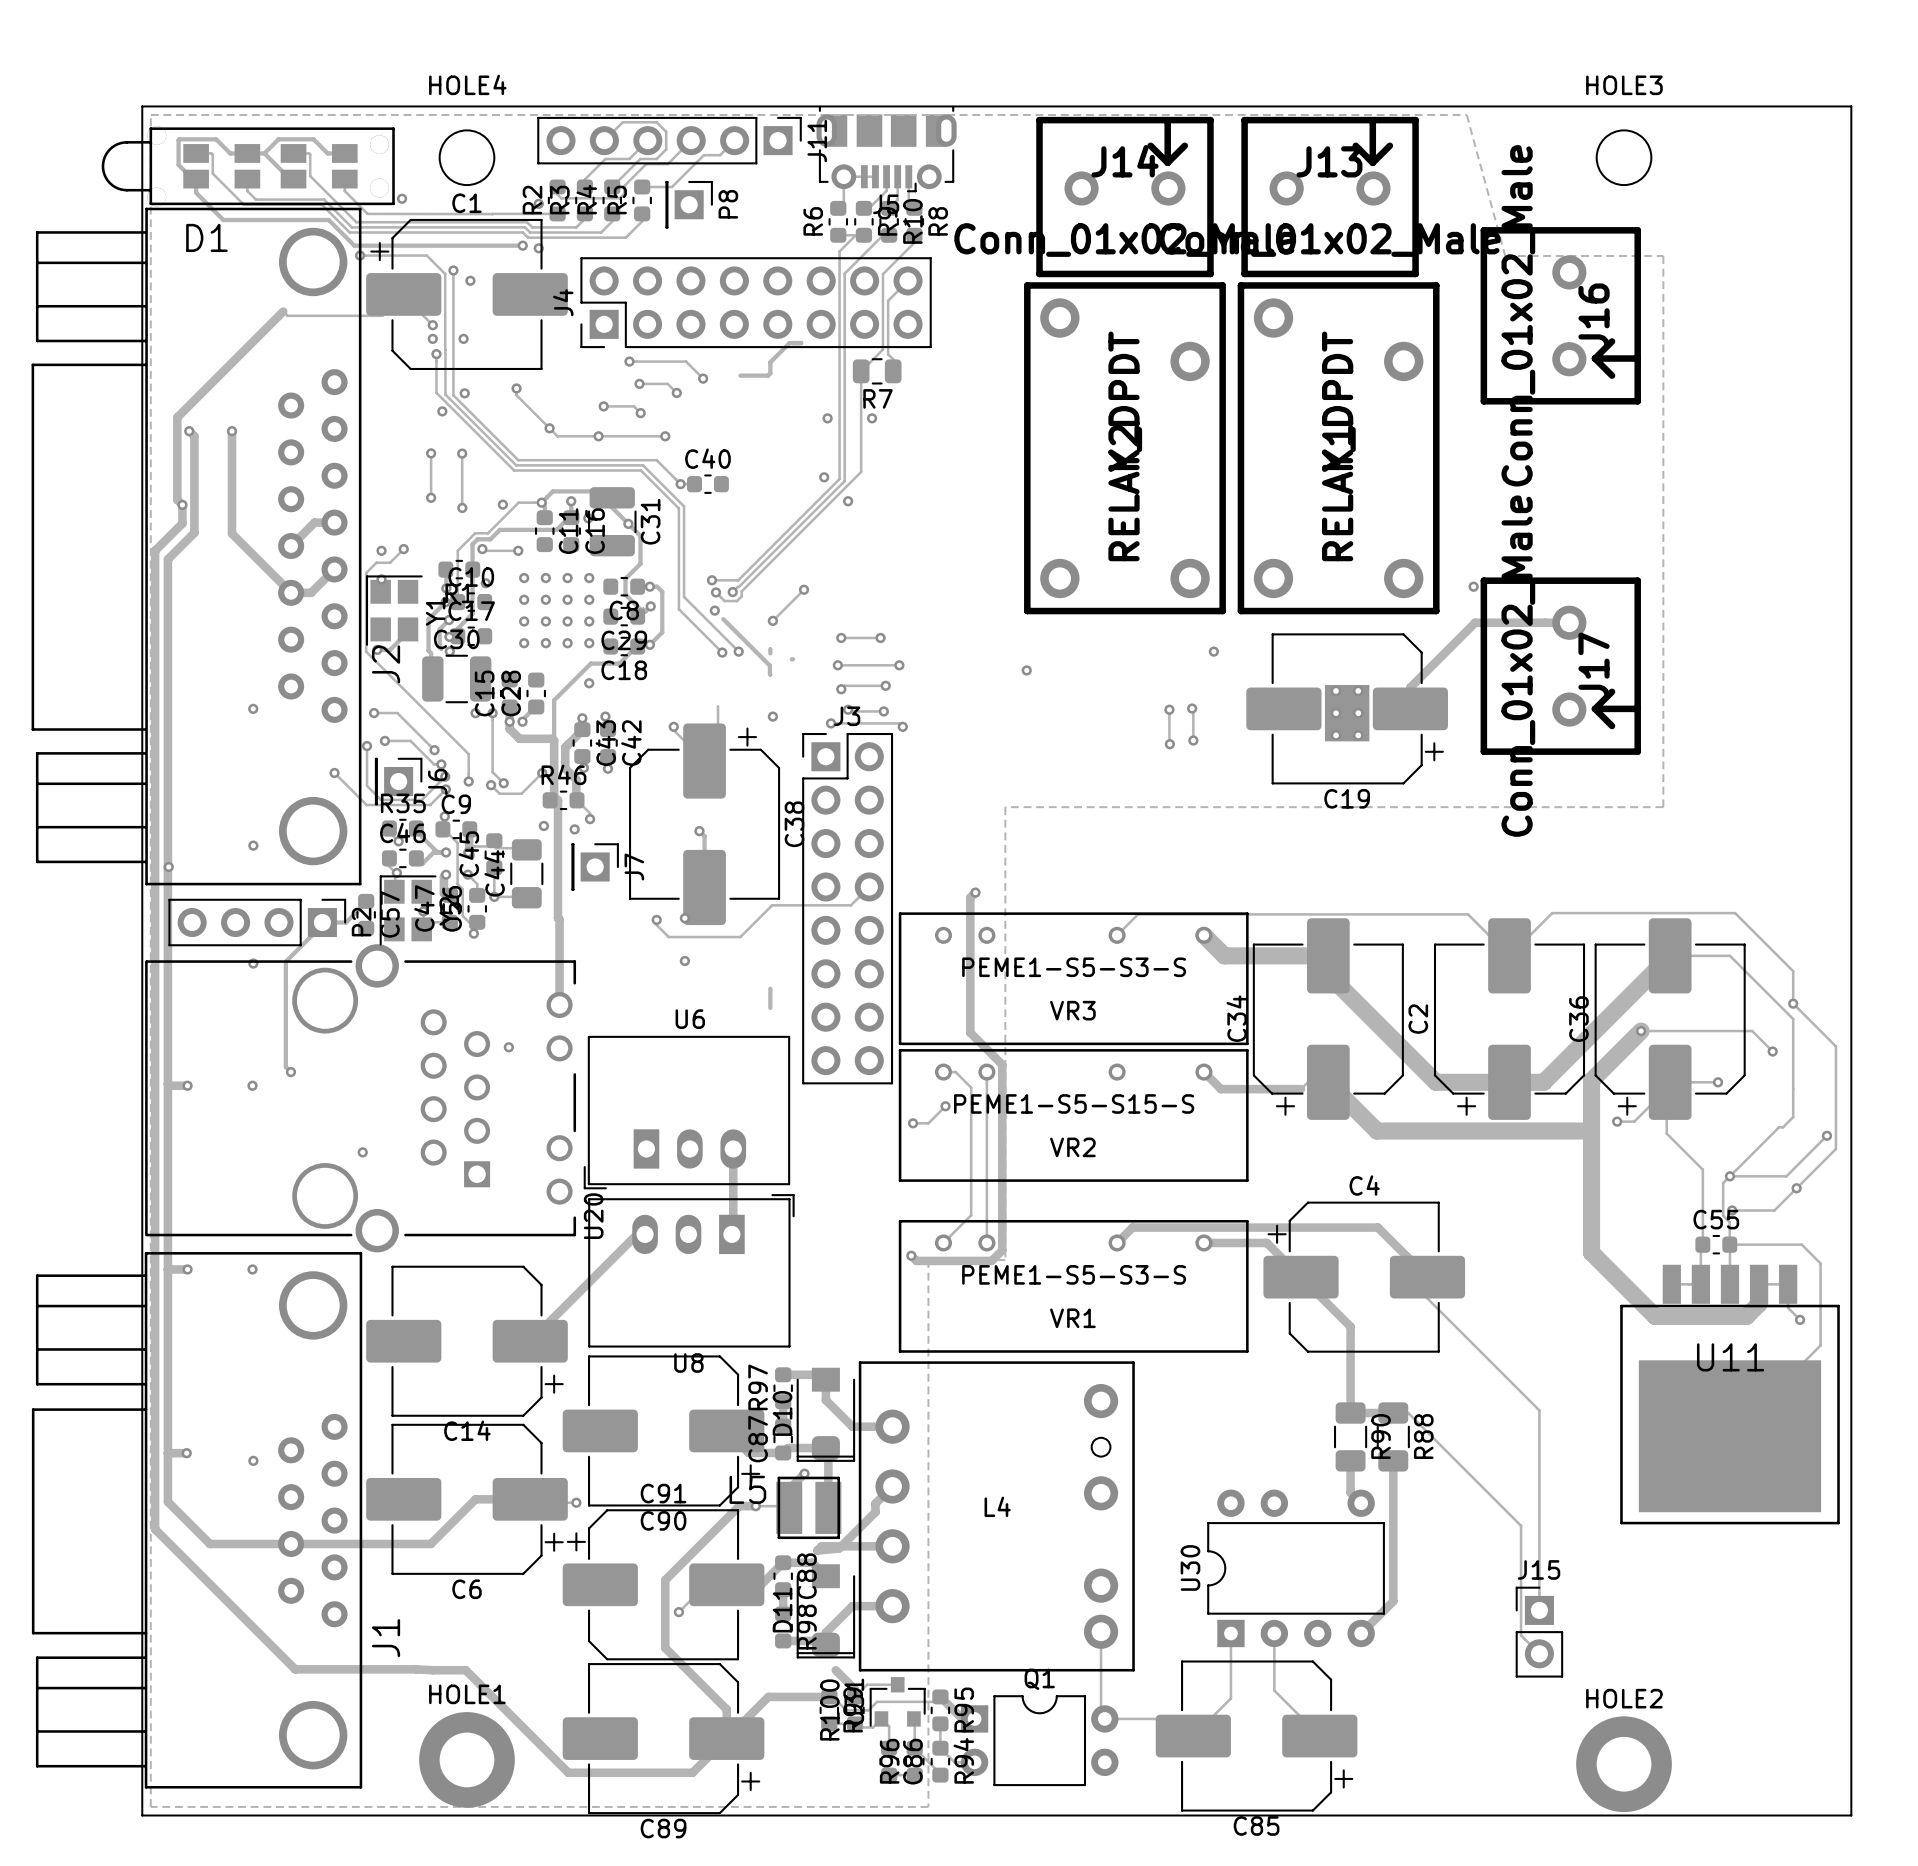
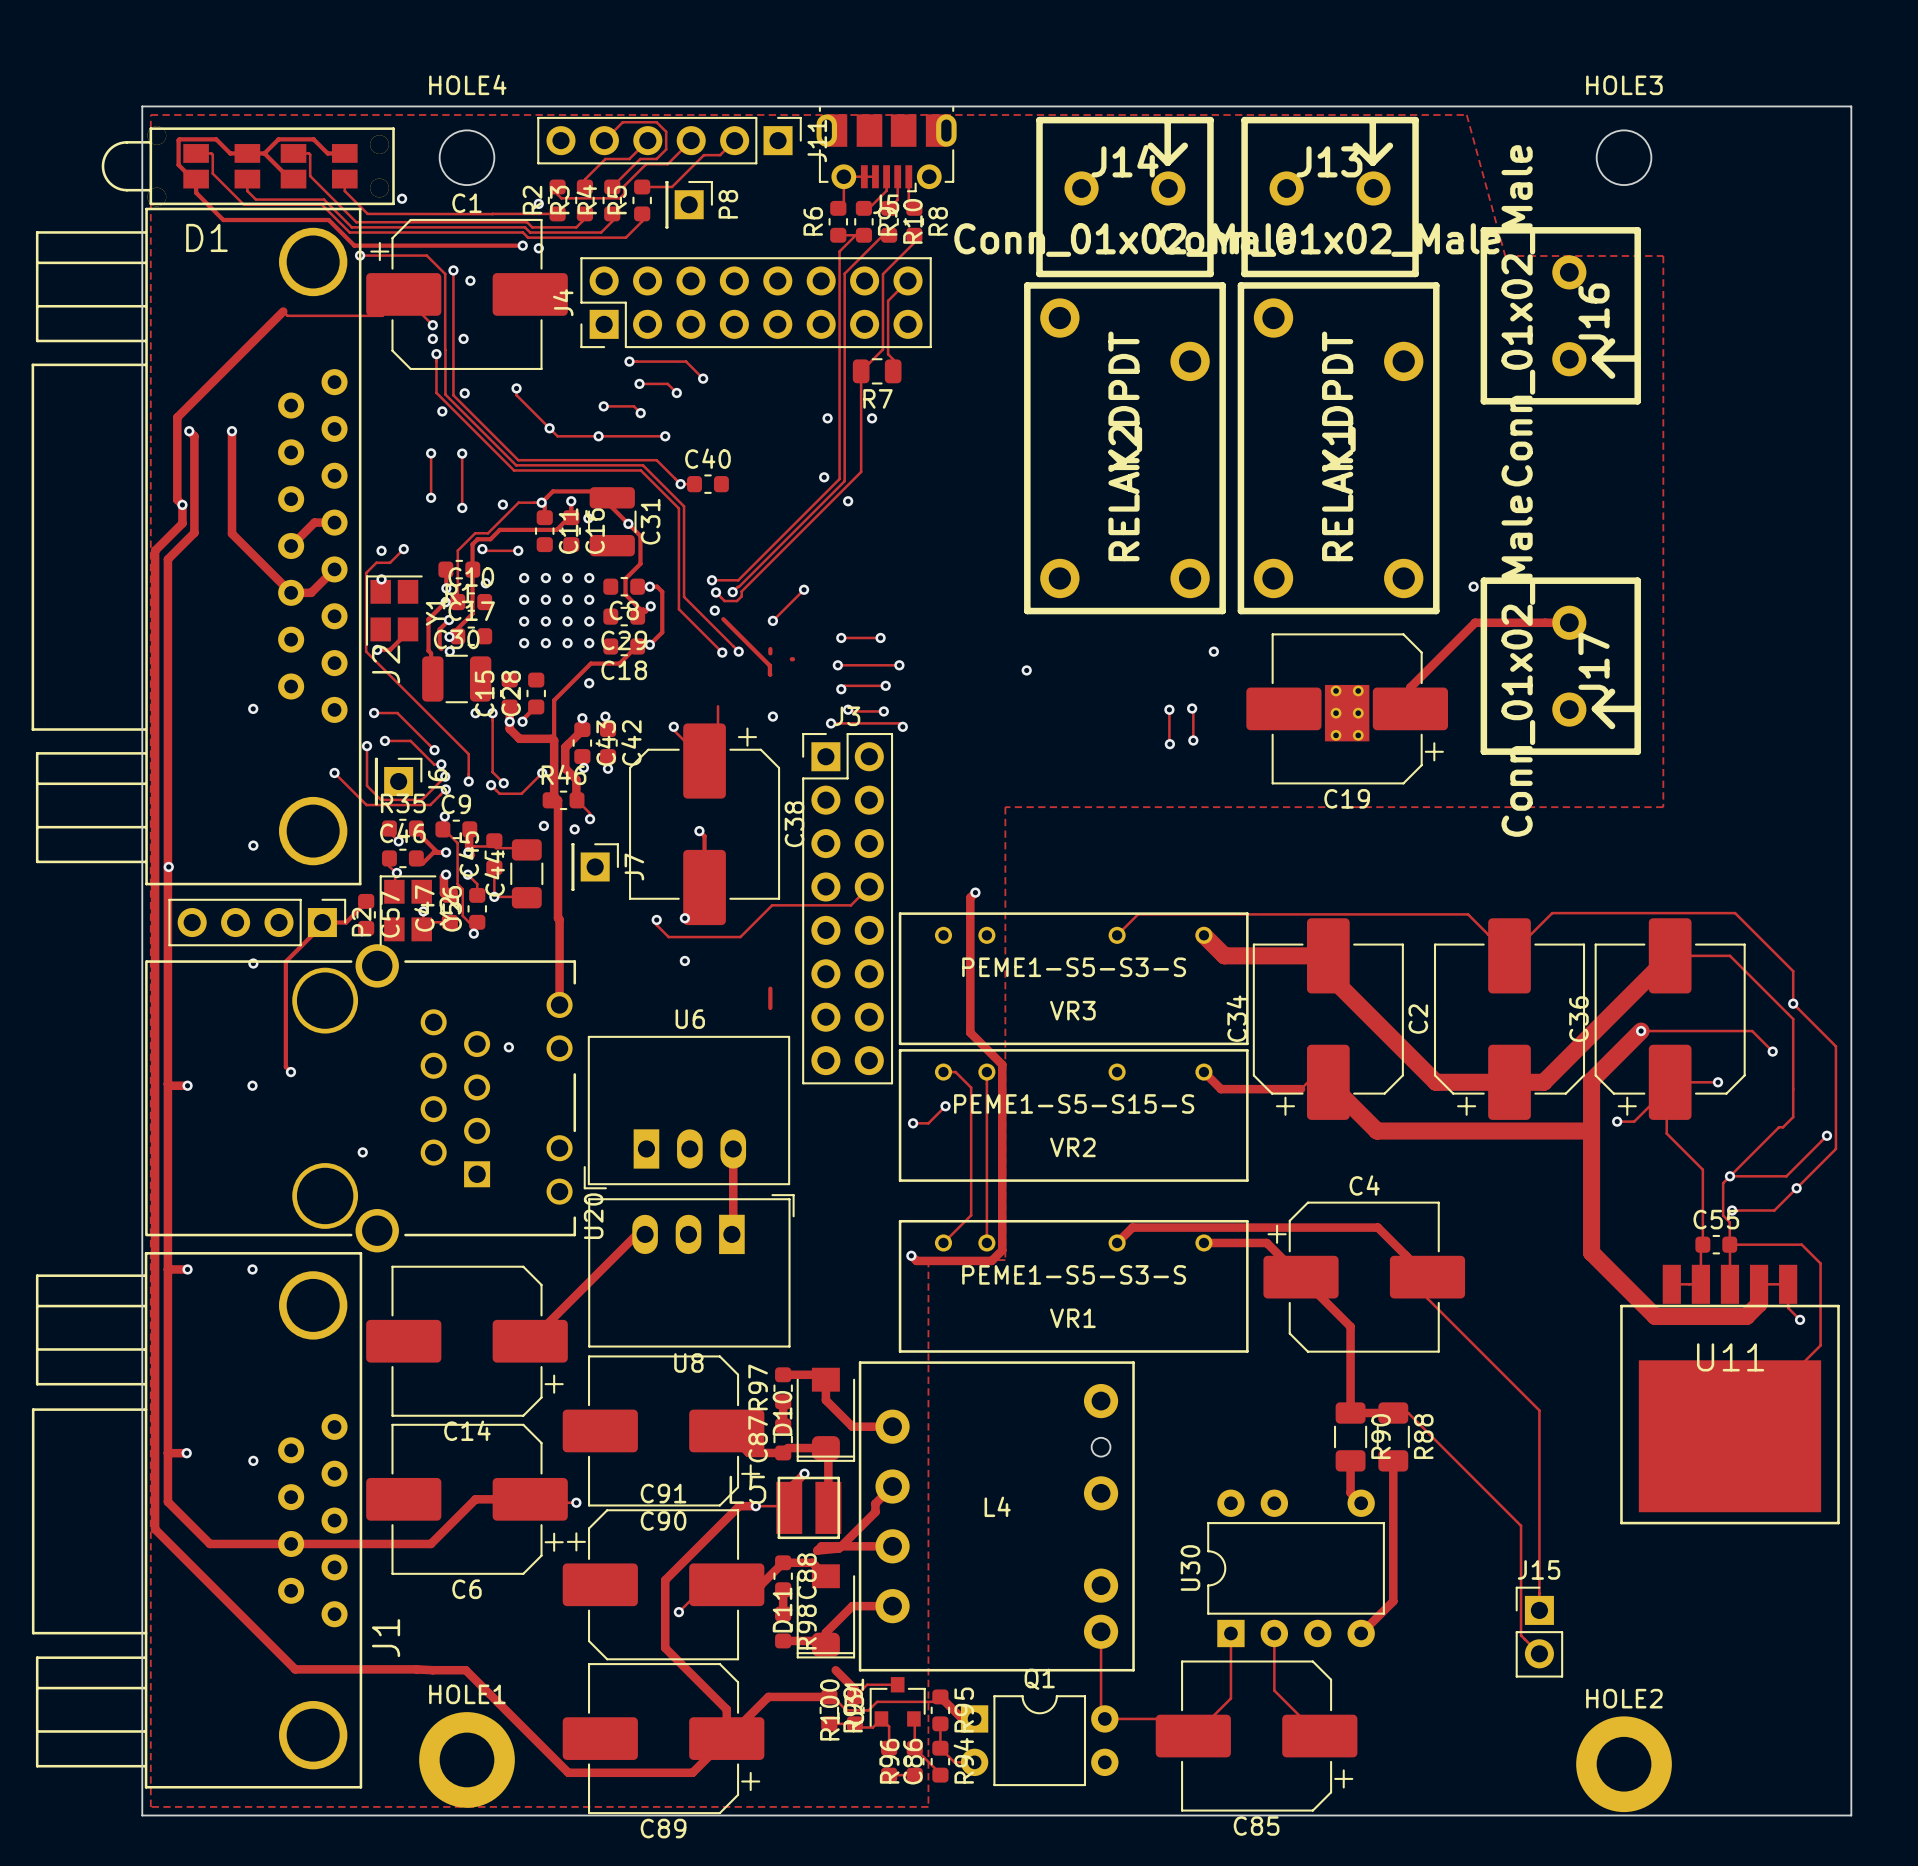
track: (801, 343) (789, 343) (770, 362) (770, 373) (768, 375) (740, 375) -> none

